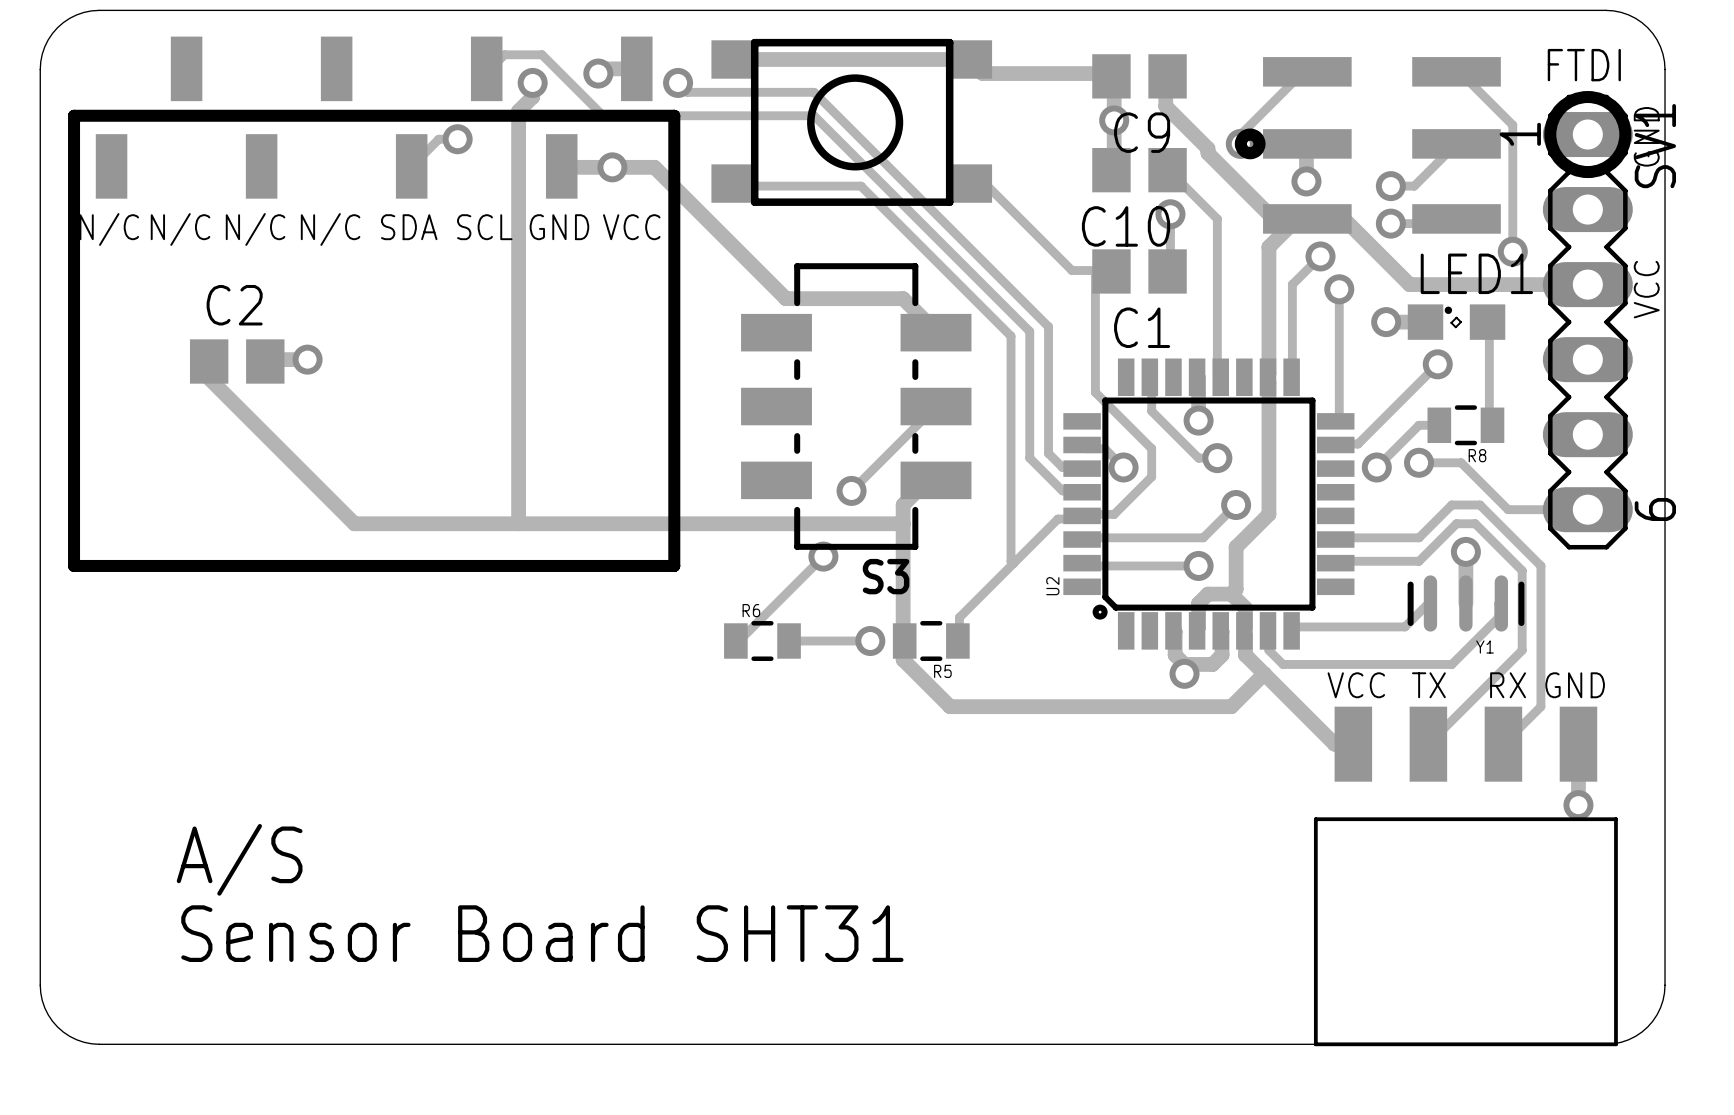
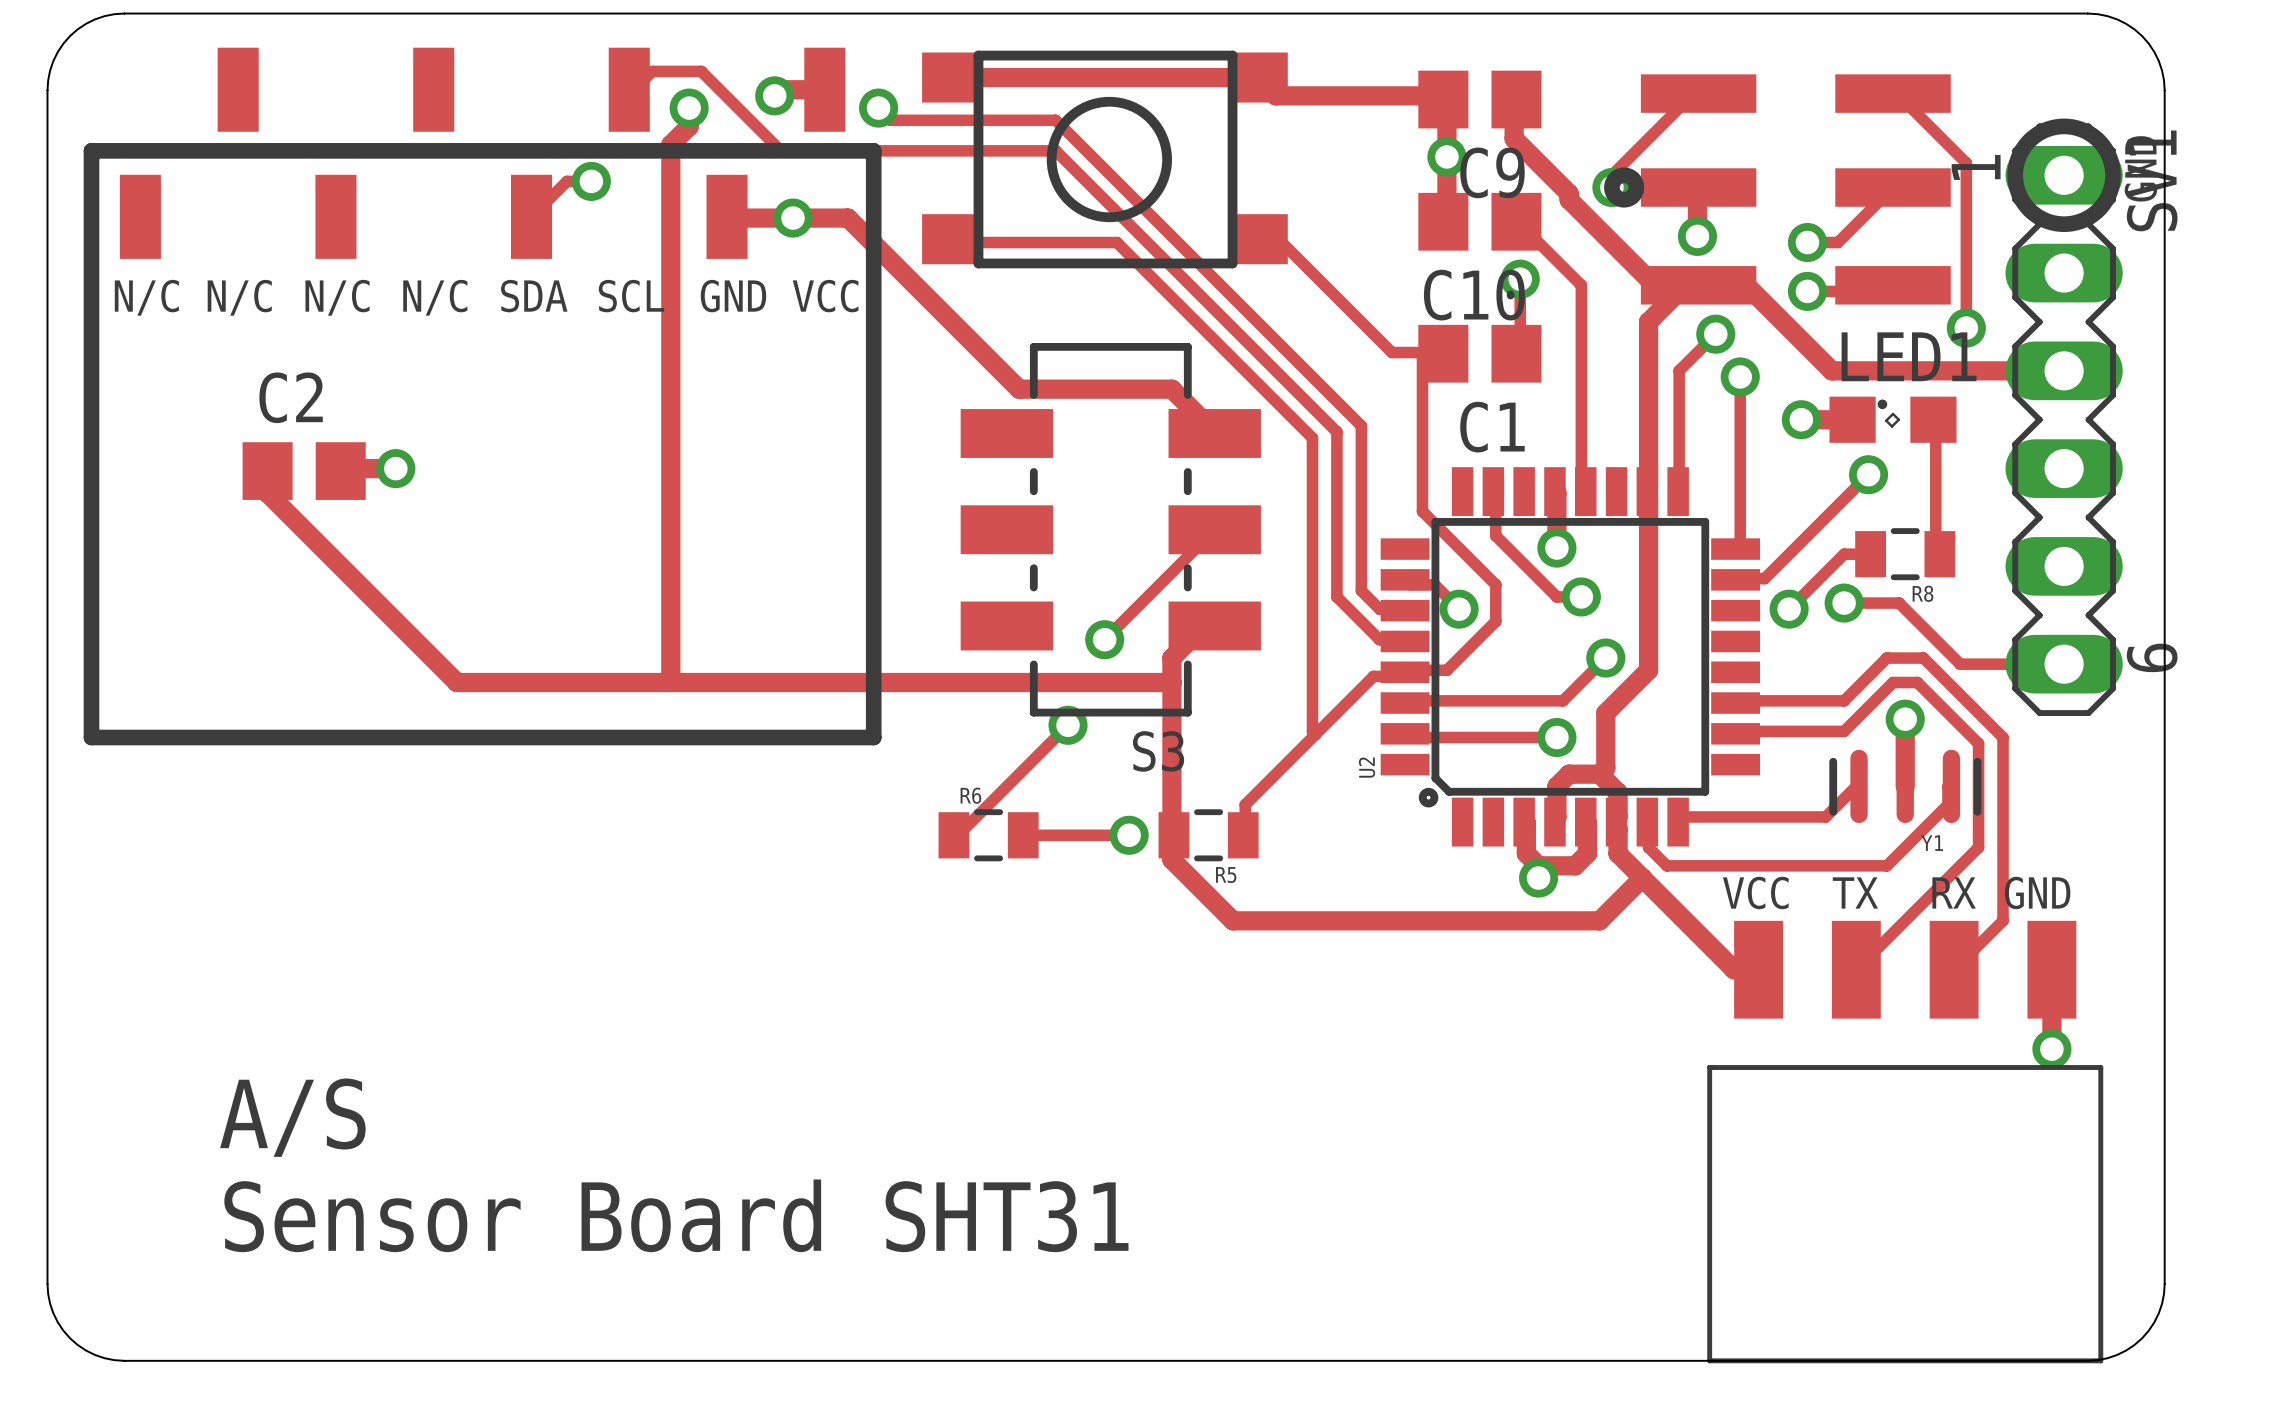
text: FTDI (1584, 65) -> none
text: VCC (1646, 289) -> none

